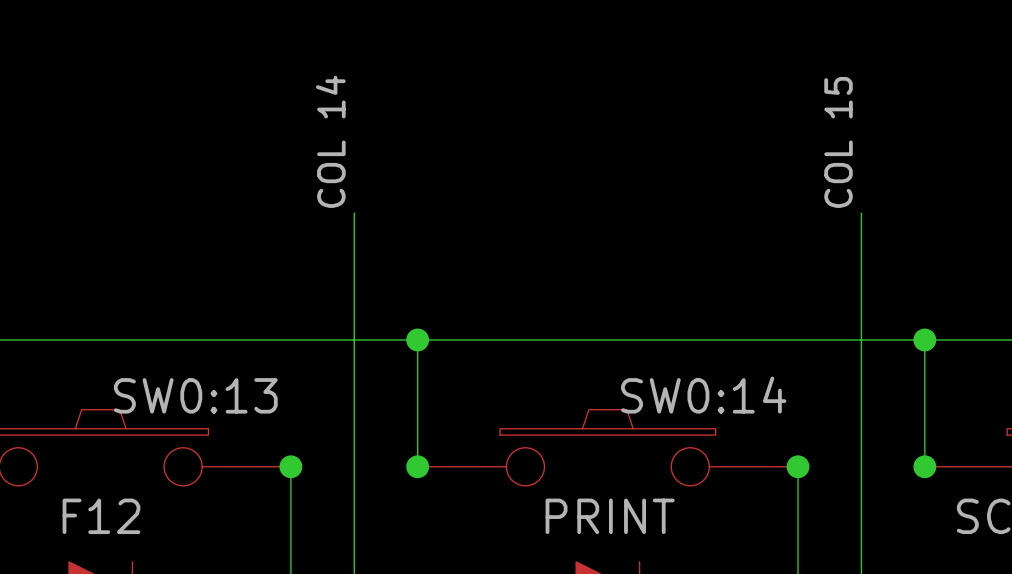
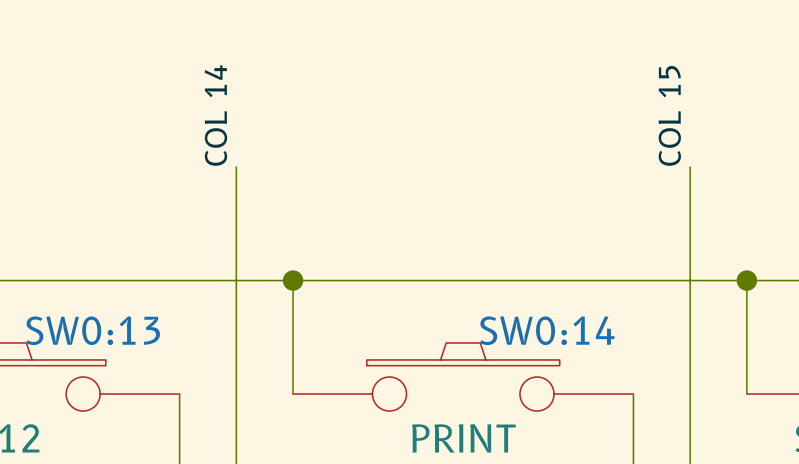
junction: (290, 466) -> none
junction: (417, 466) -> none
junction: (798, 466) -> none
junction: (924, 466) -> none

